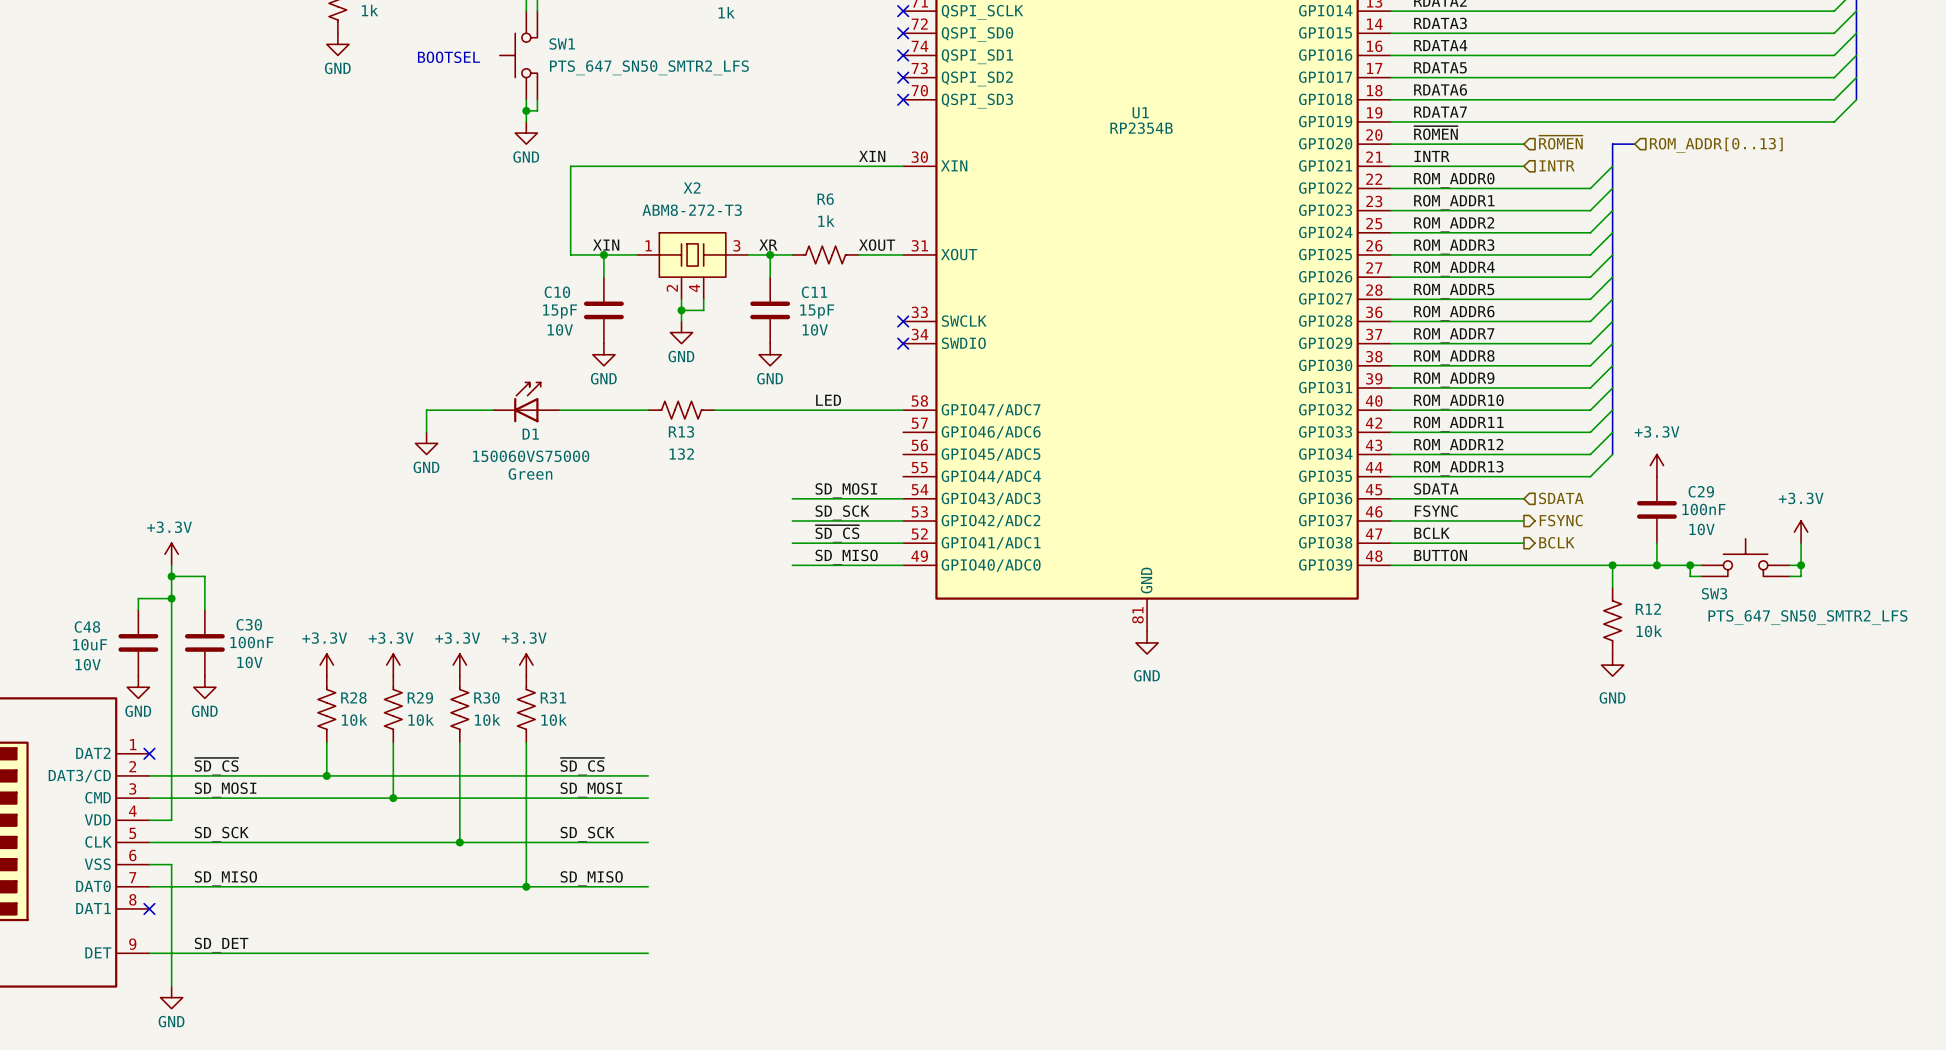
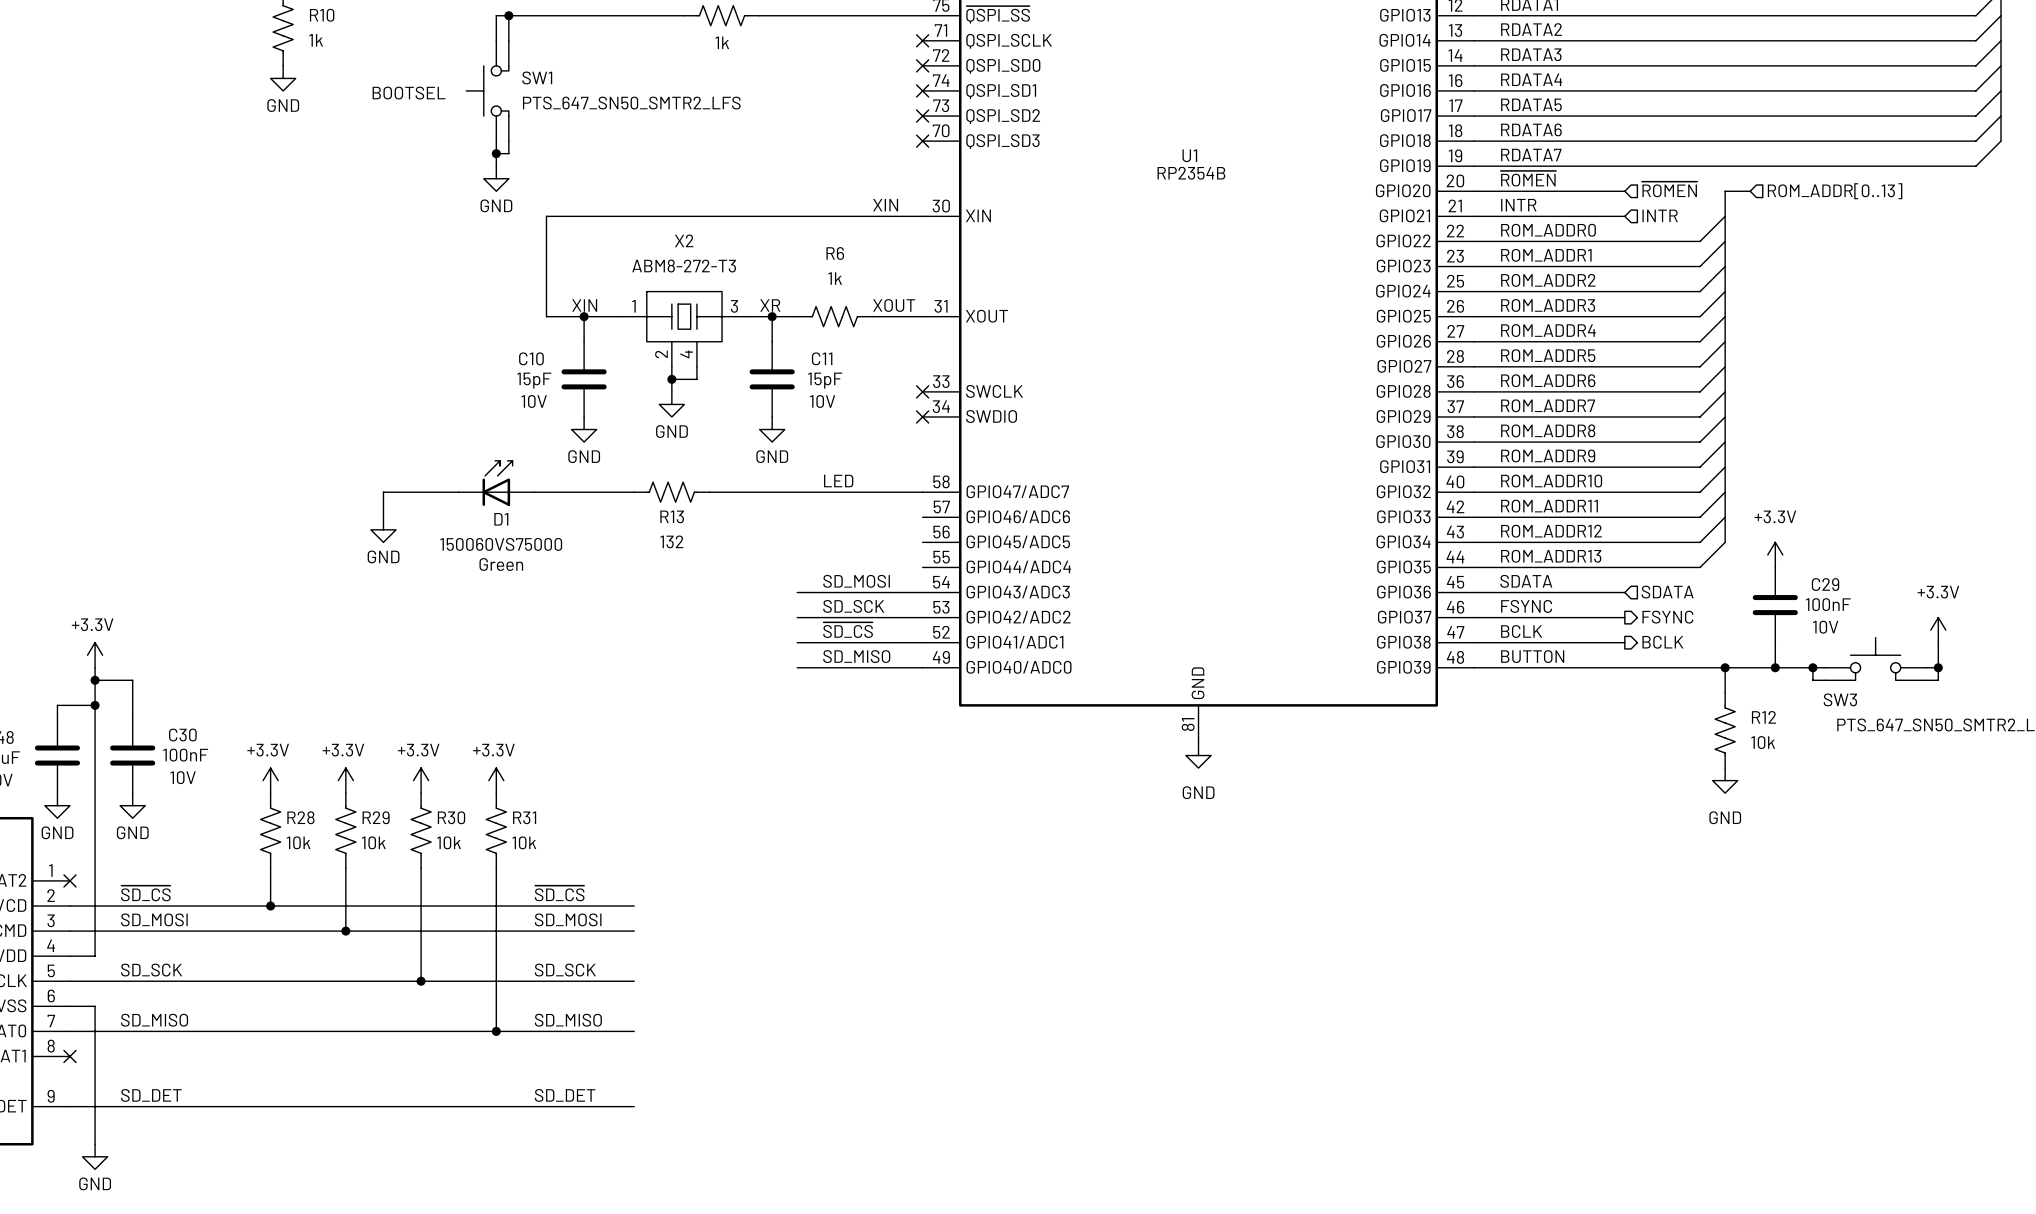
label: none -> SD_DET (565, 1095)

